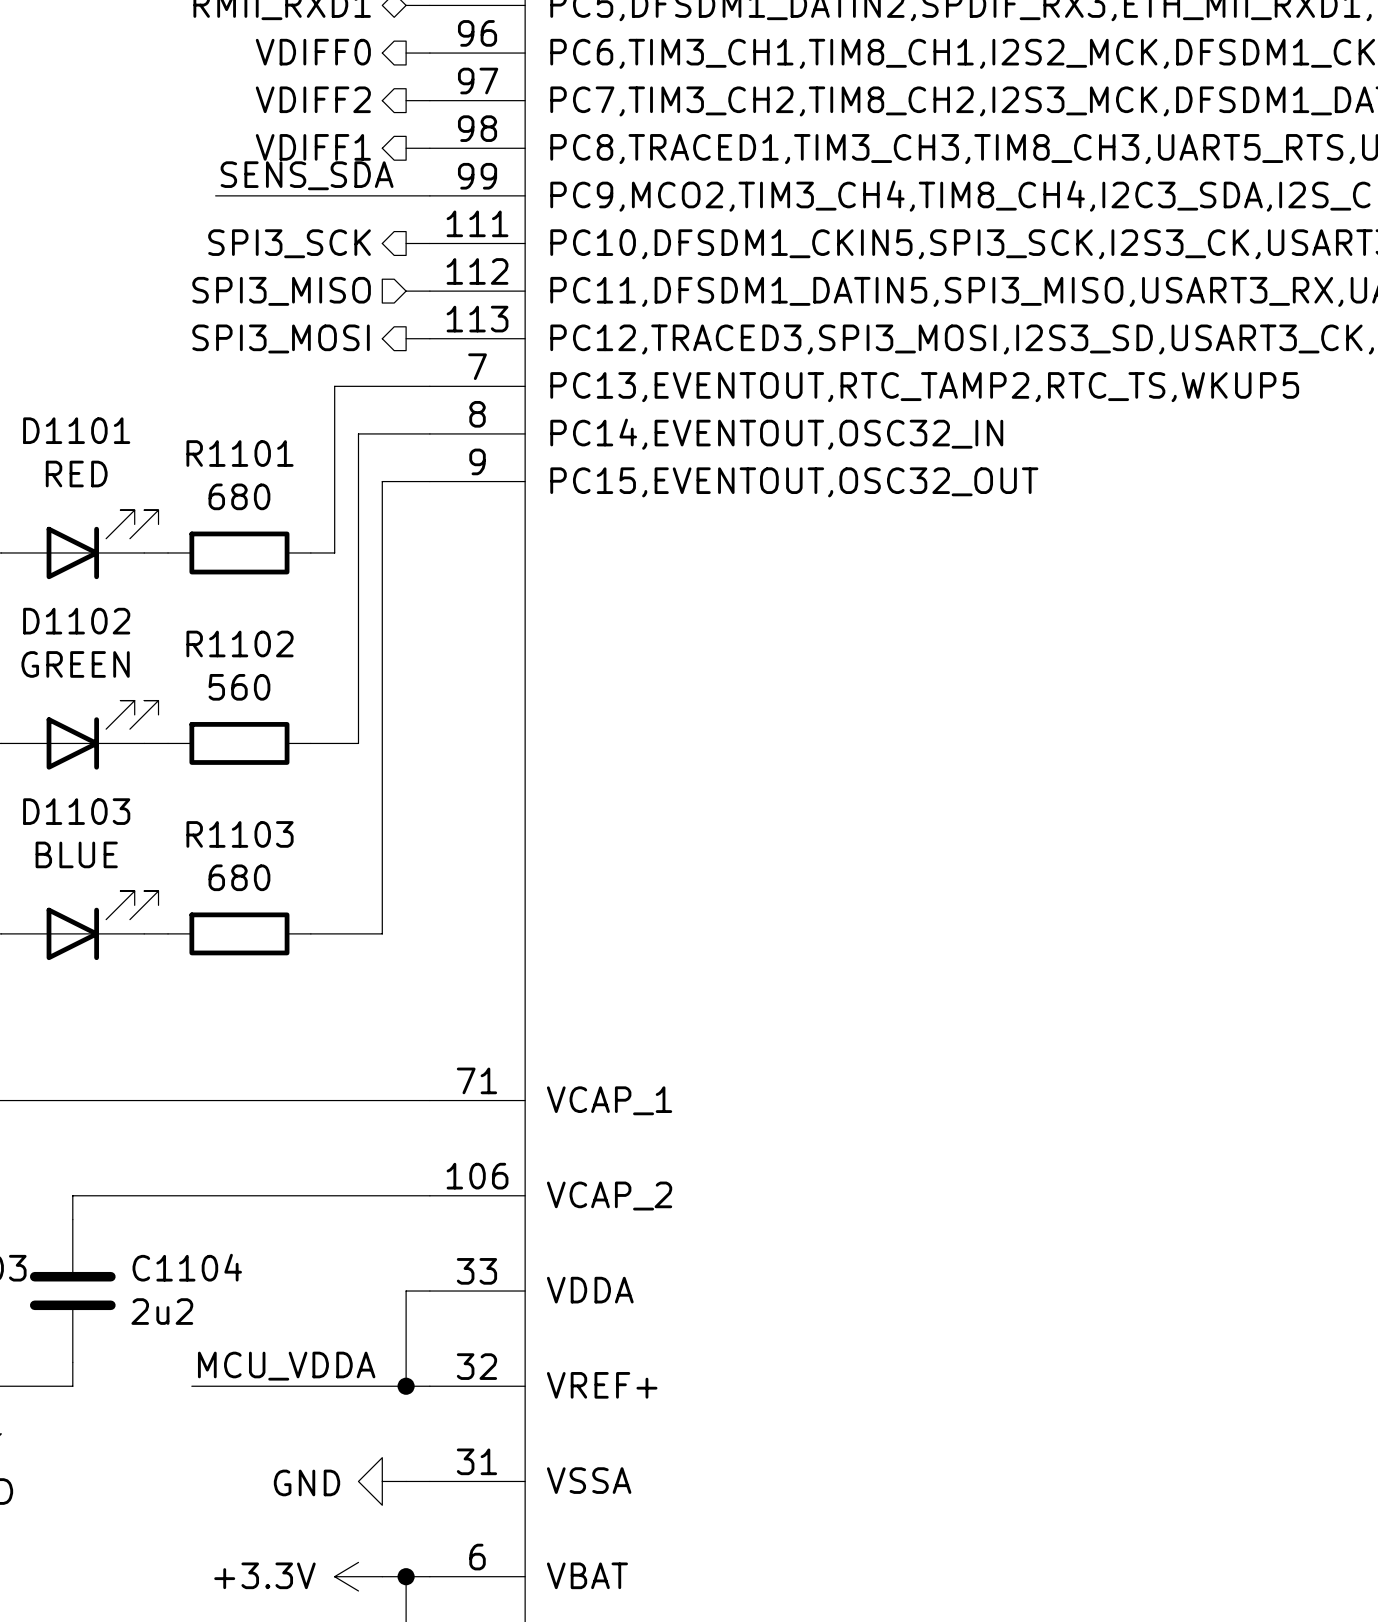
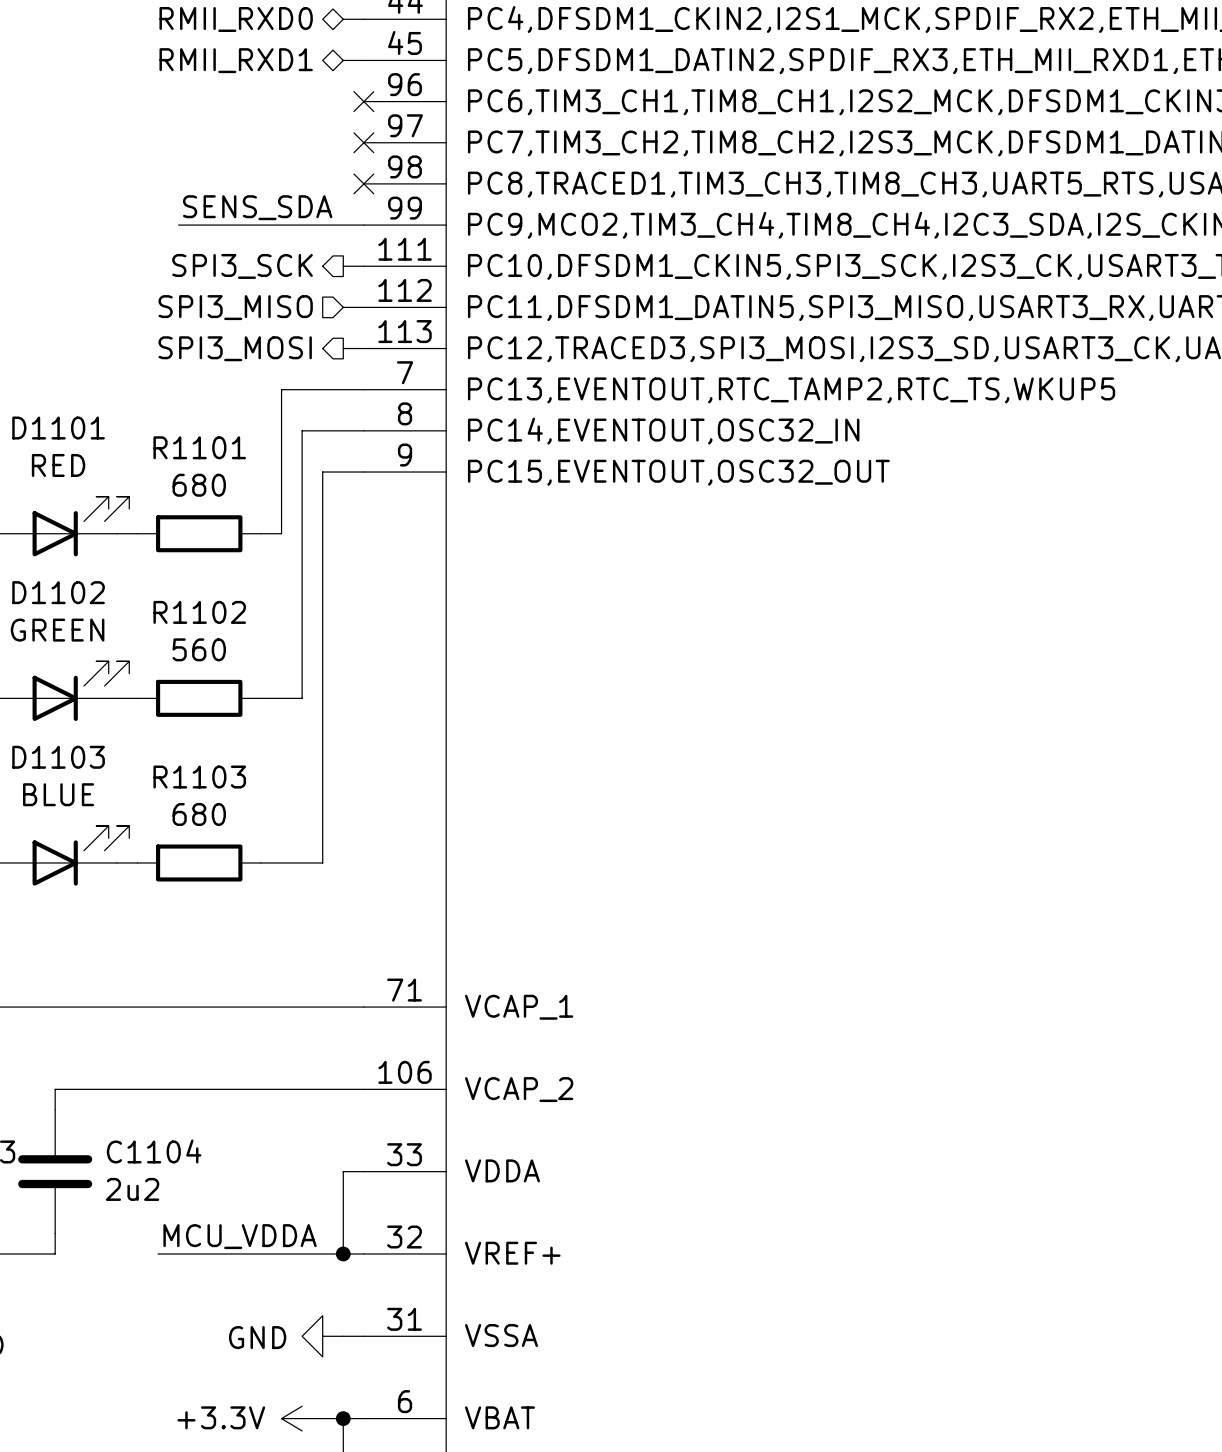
hierarchical label: VDIFF0 (313, 52) -> none
wire: (406, 53) (429, 53) -> none
no-connect mark: none -> (363, 101)
hierarchical label: VDIFF2 (313, 99) -> none
wire: (406, 100) (429, 100) -> none
no-connect mark: none -> (363, 142)
hierarchical label: VDIFF1 (313, 147) -> none
wire: (406, 148) (429, 148) -> none
no-connect mark: none -> (363, 183)

